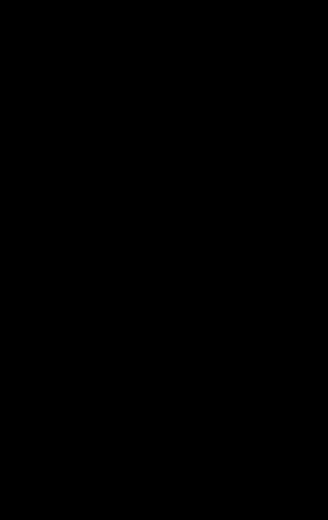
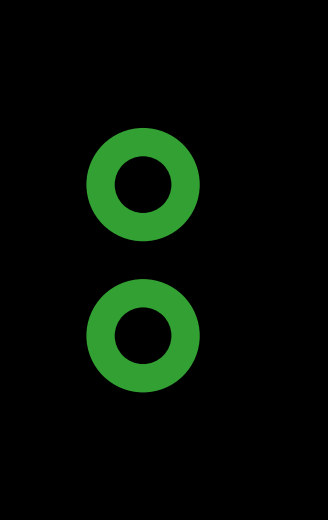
via: none -> (143, 184)
via: none -> (143, 335)

